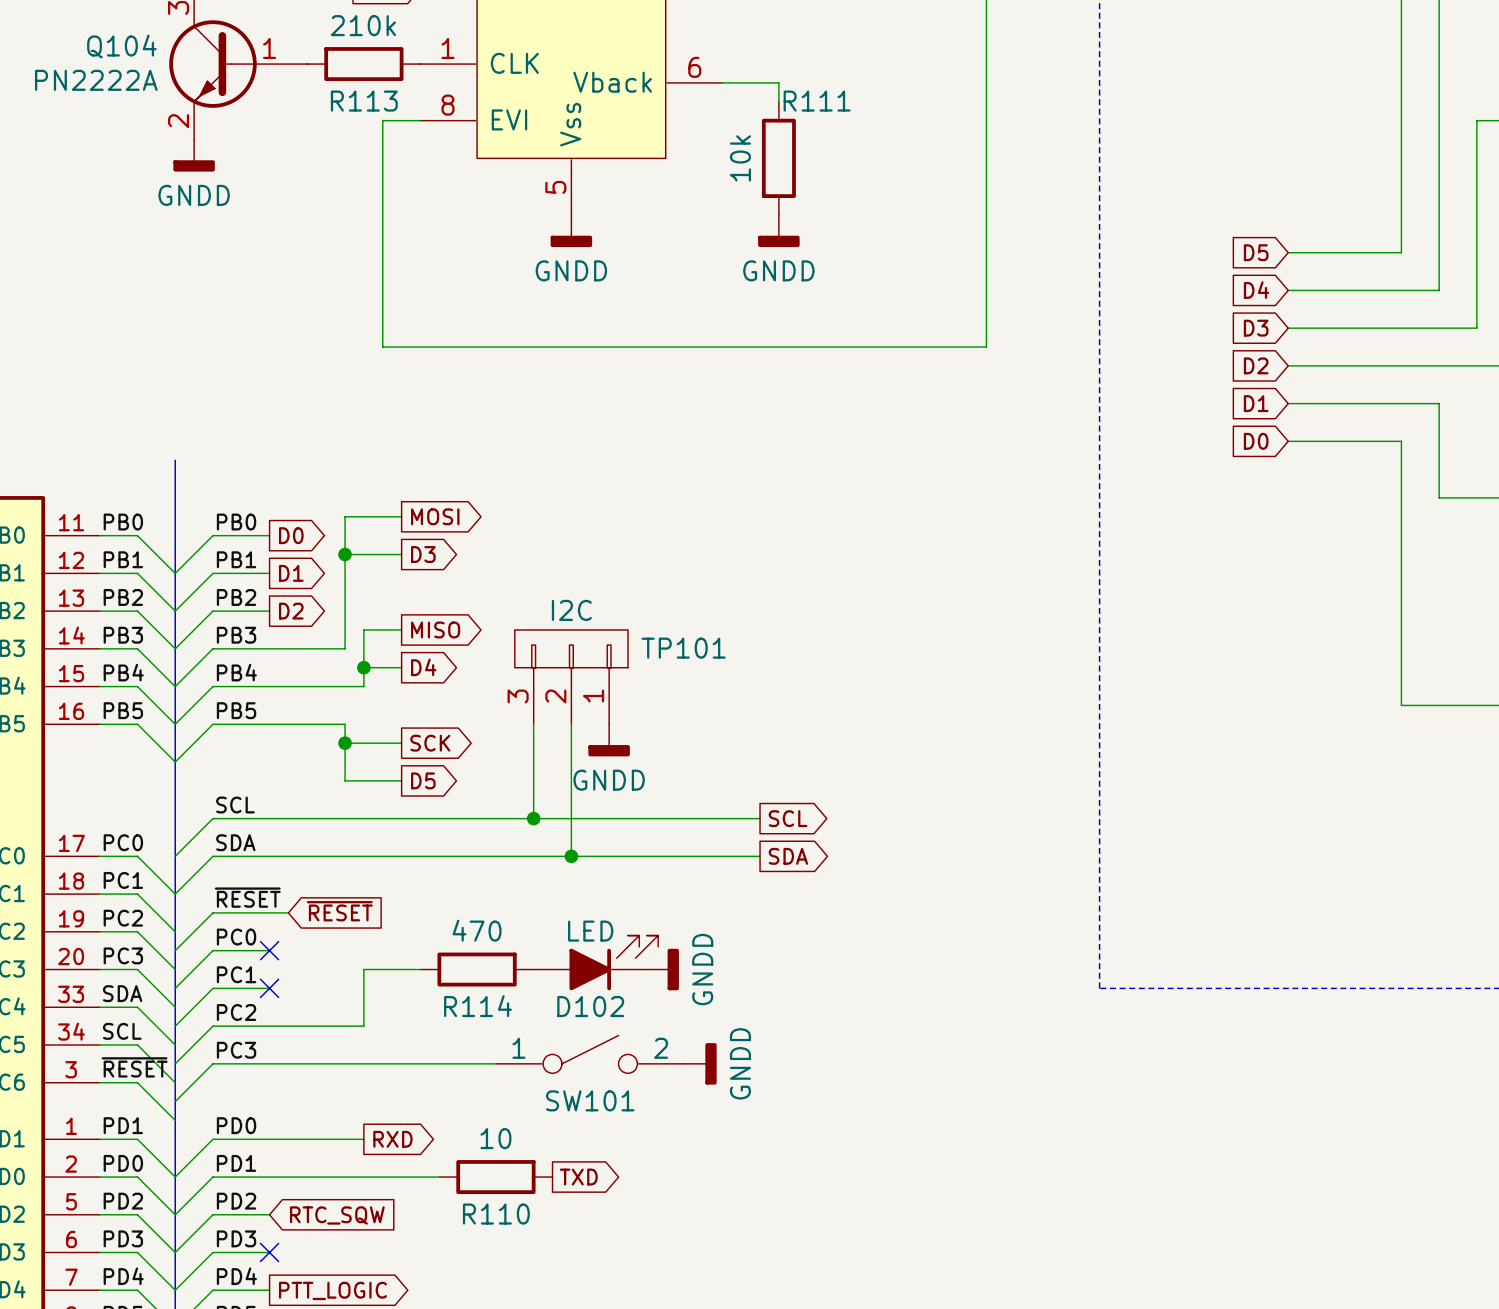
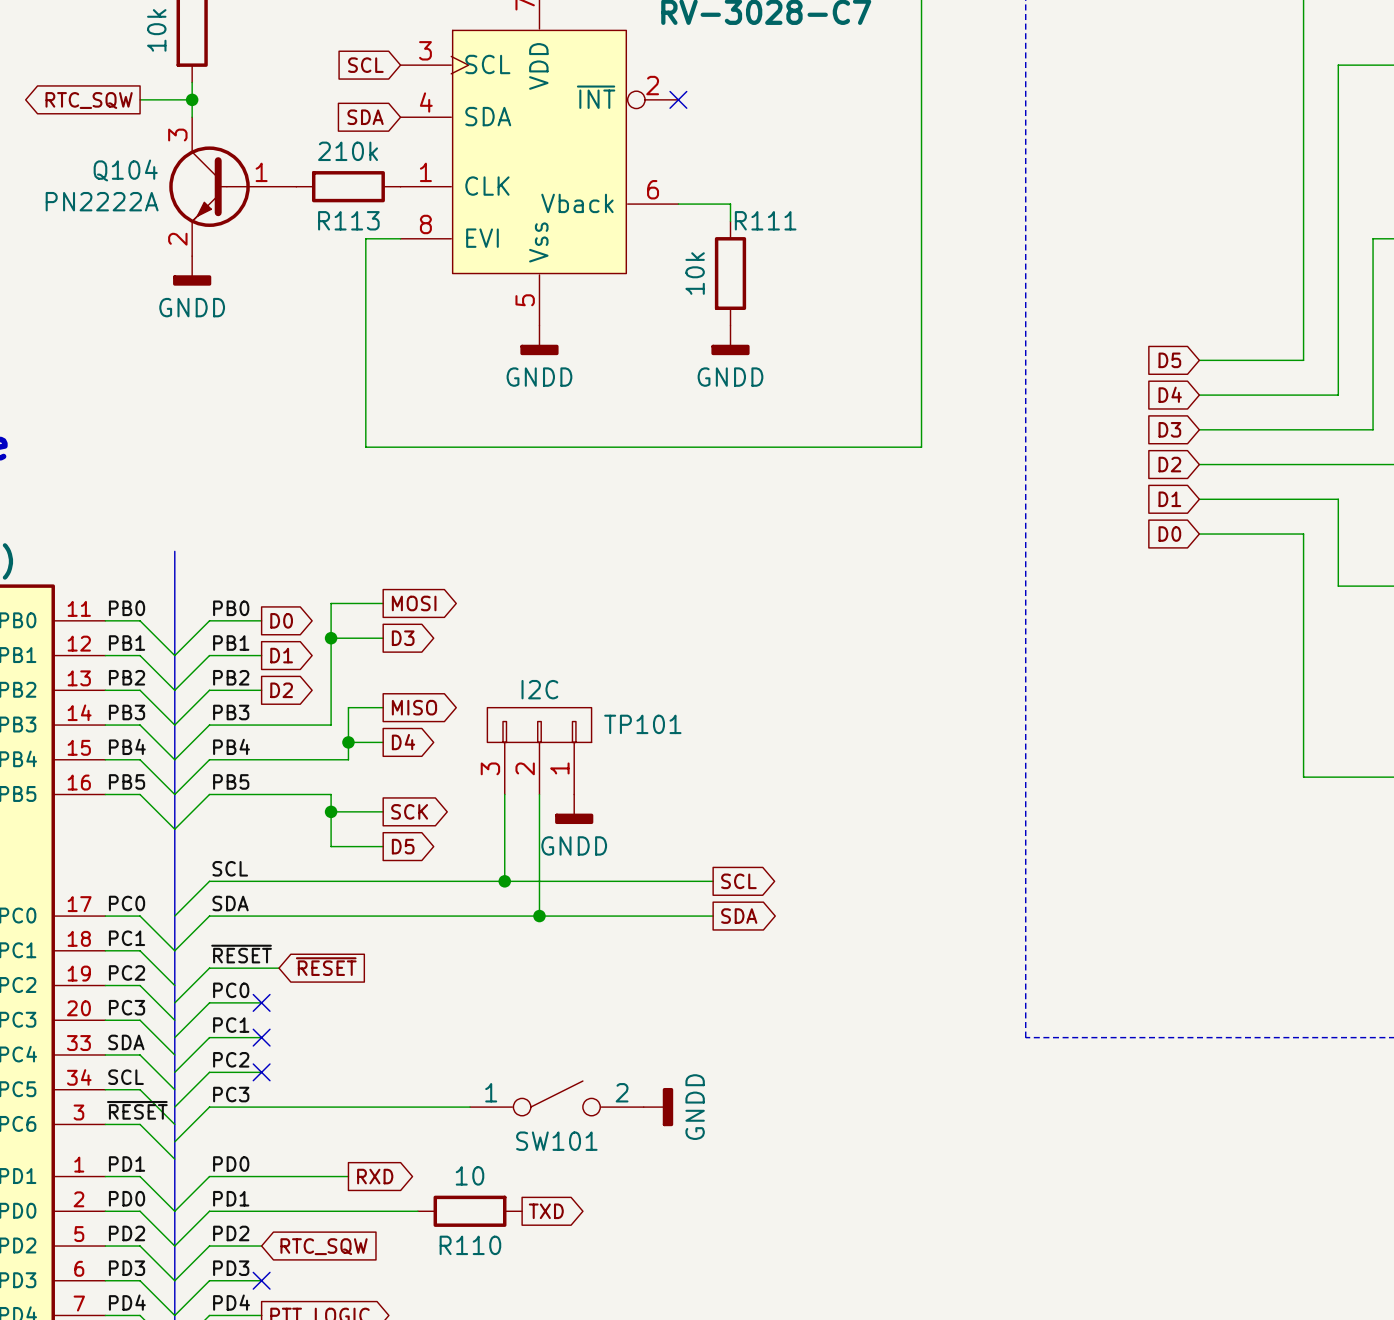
D102: LED (595, 962) -> none
wire: (420, 969) (363, 969) (363, 1026) (269, 1026) -> none
R114: 470 (477, 969) -> none
power symbol: GNDD (662, 969) -> none
no-connect mark: none -> (261, 1072)

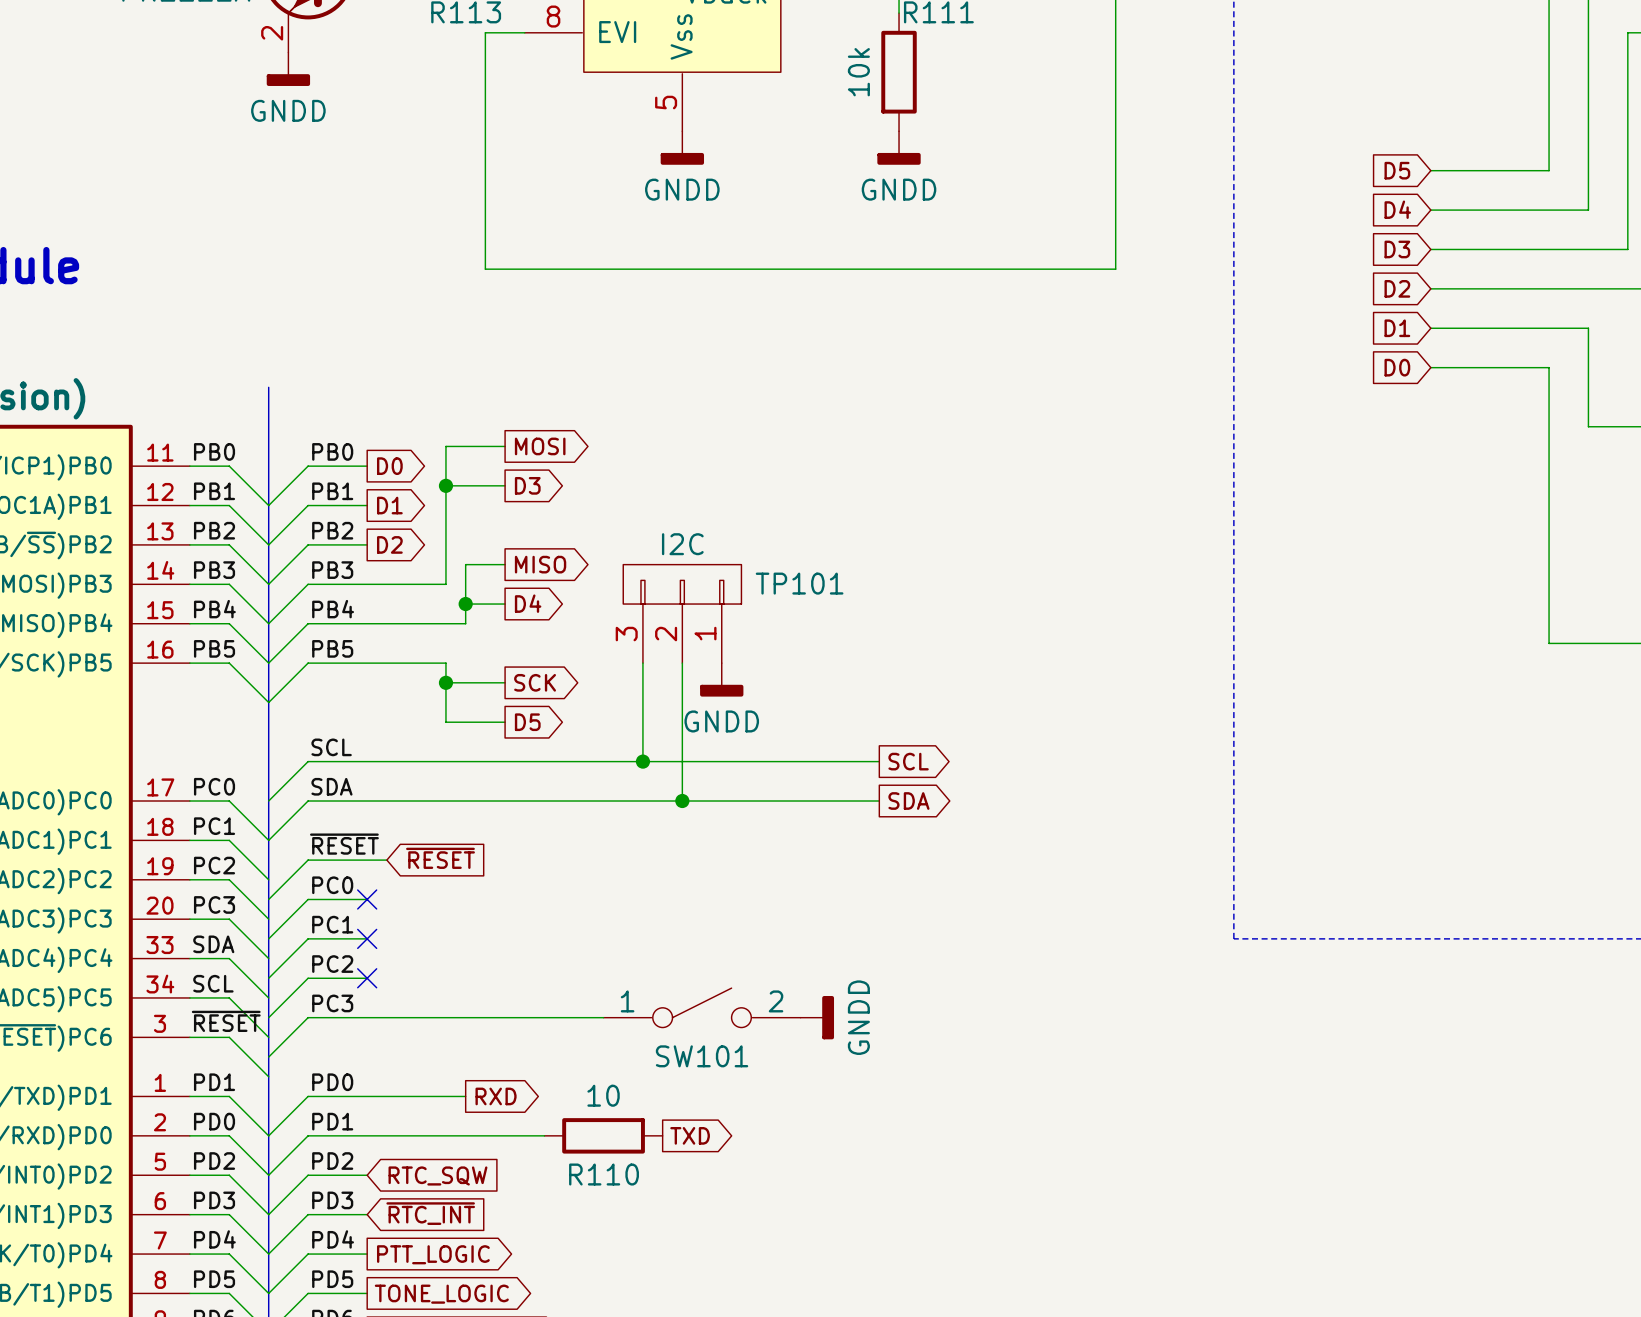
global label: none -> ~{RTC_INT} (430, 1213)
no-connect mark: (261, 1280) -> none

